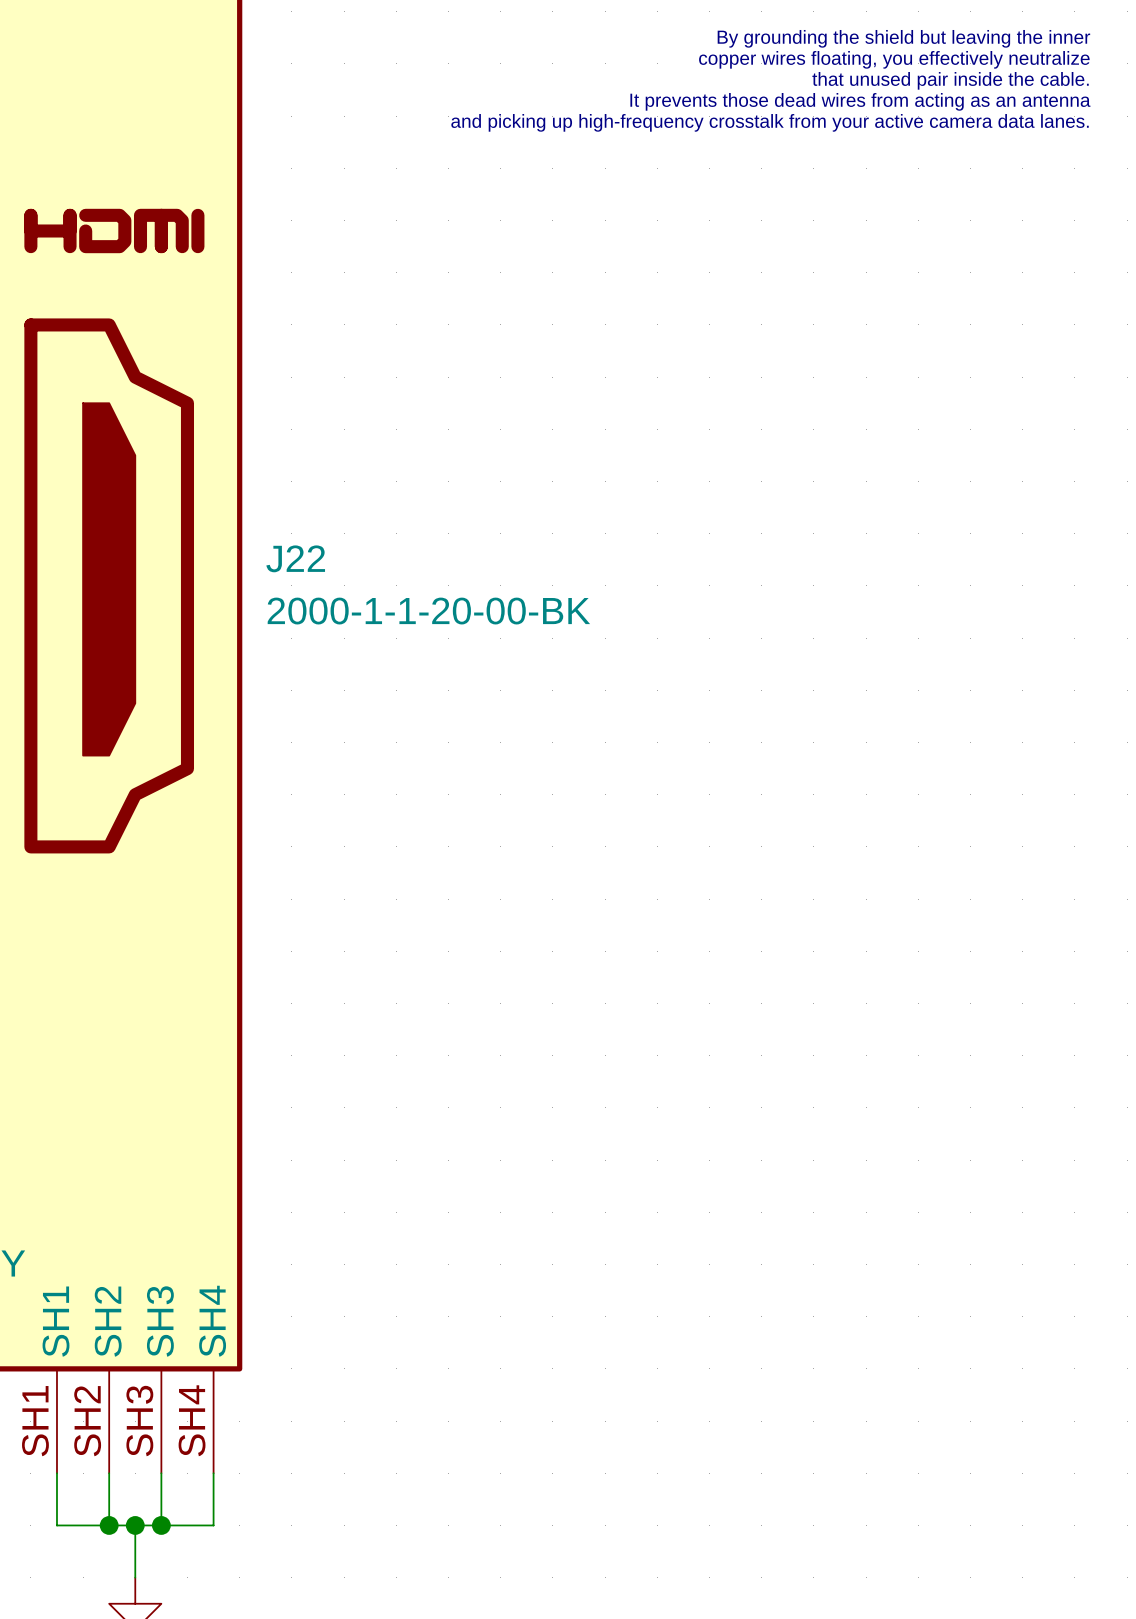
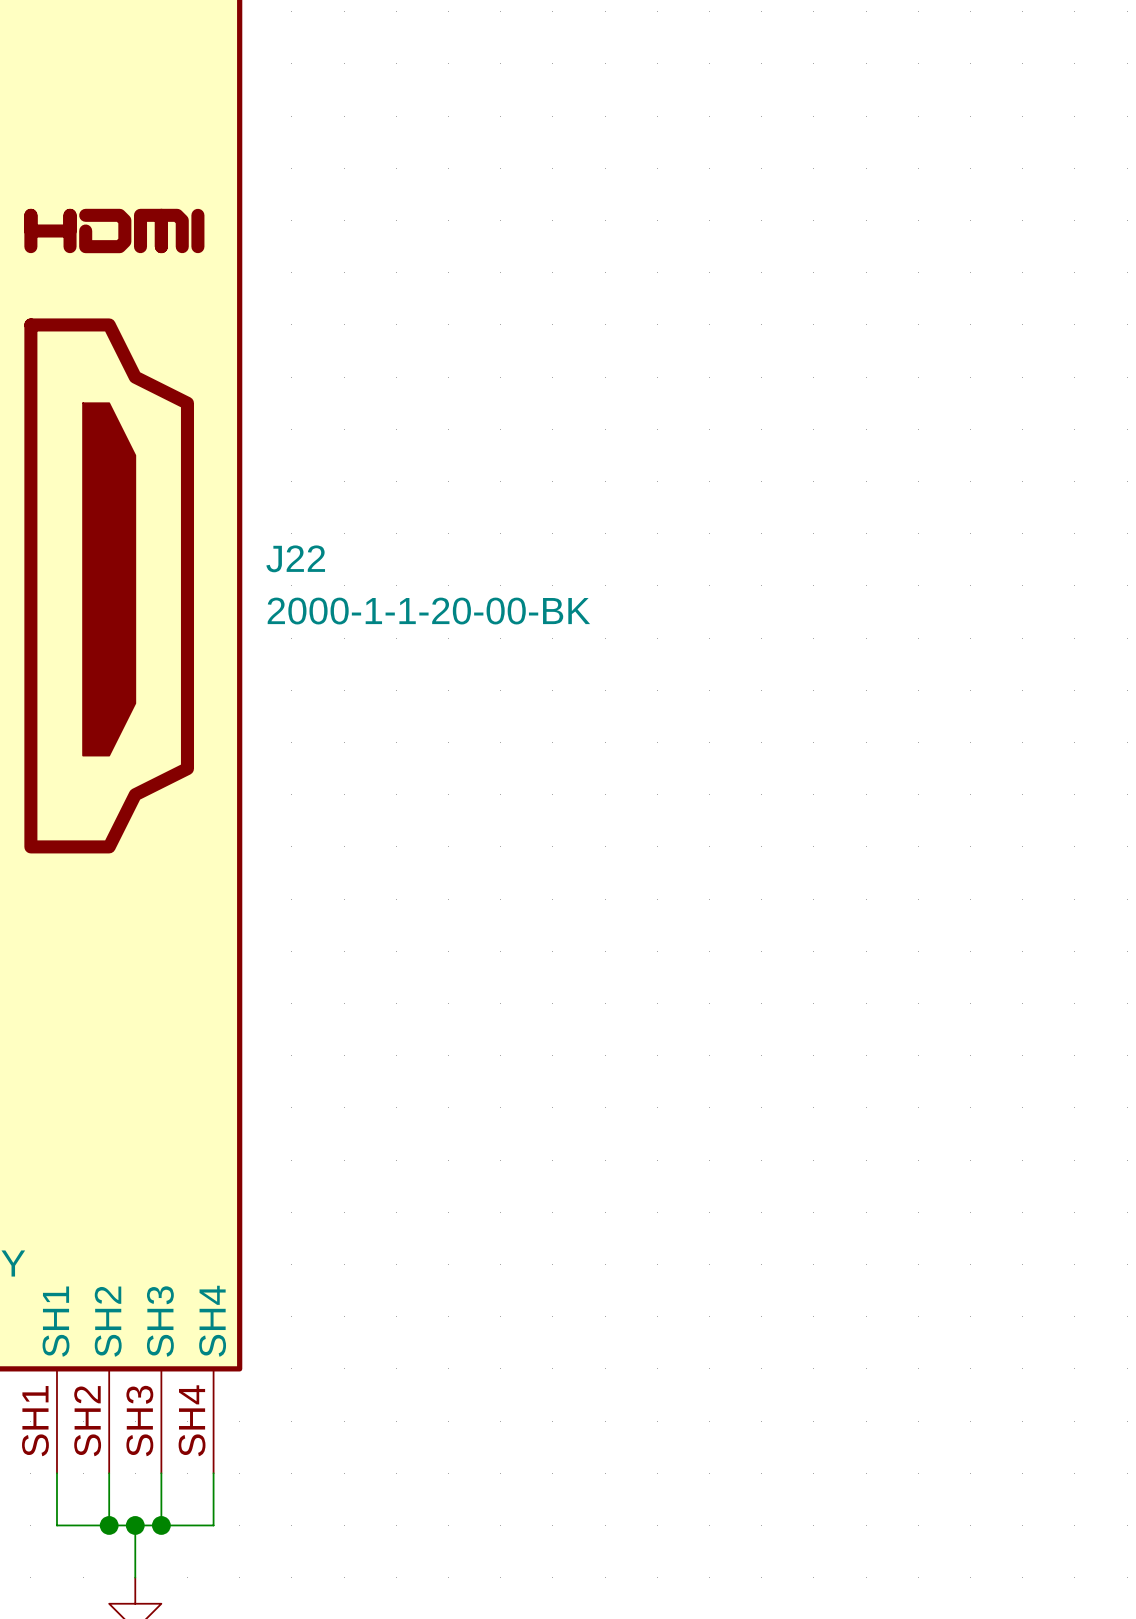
text: By grounding the shield but leaving the inner (903, 38) -> none
text: copper wires floating, you effectively neutralize (894, 59) -> none
text: that unused pair inside the cable. (950, 80) -> none
text: It prevents those dead wires from acting as an antenna (860, 101) -> none
text: and picking up high-frequency crosstalk from your active camera data lanes. (770, 122) -> none

